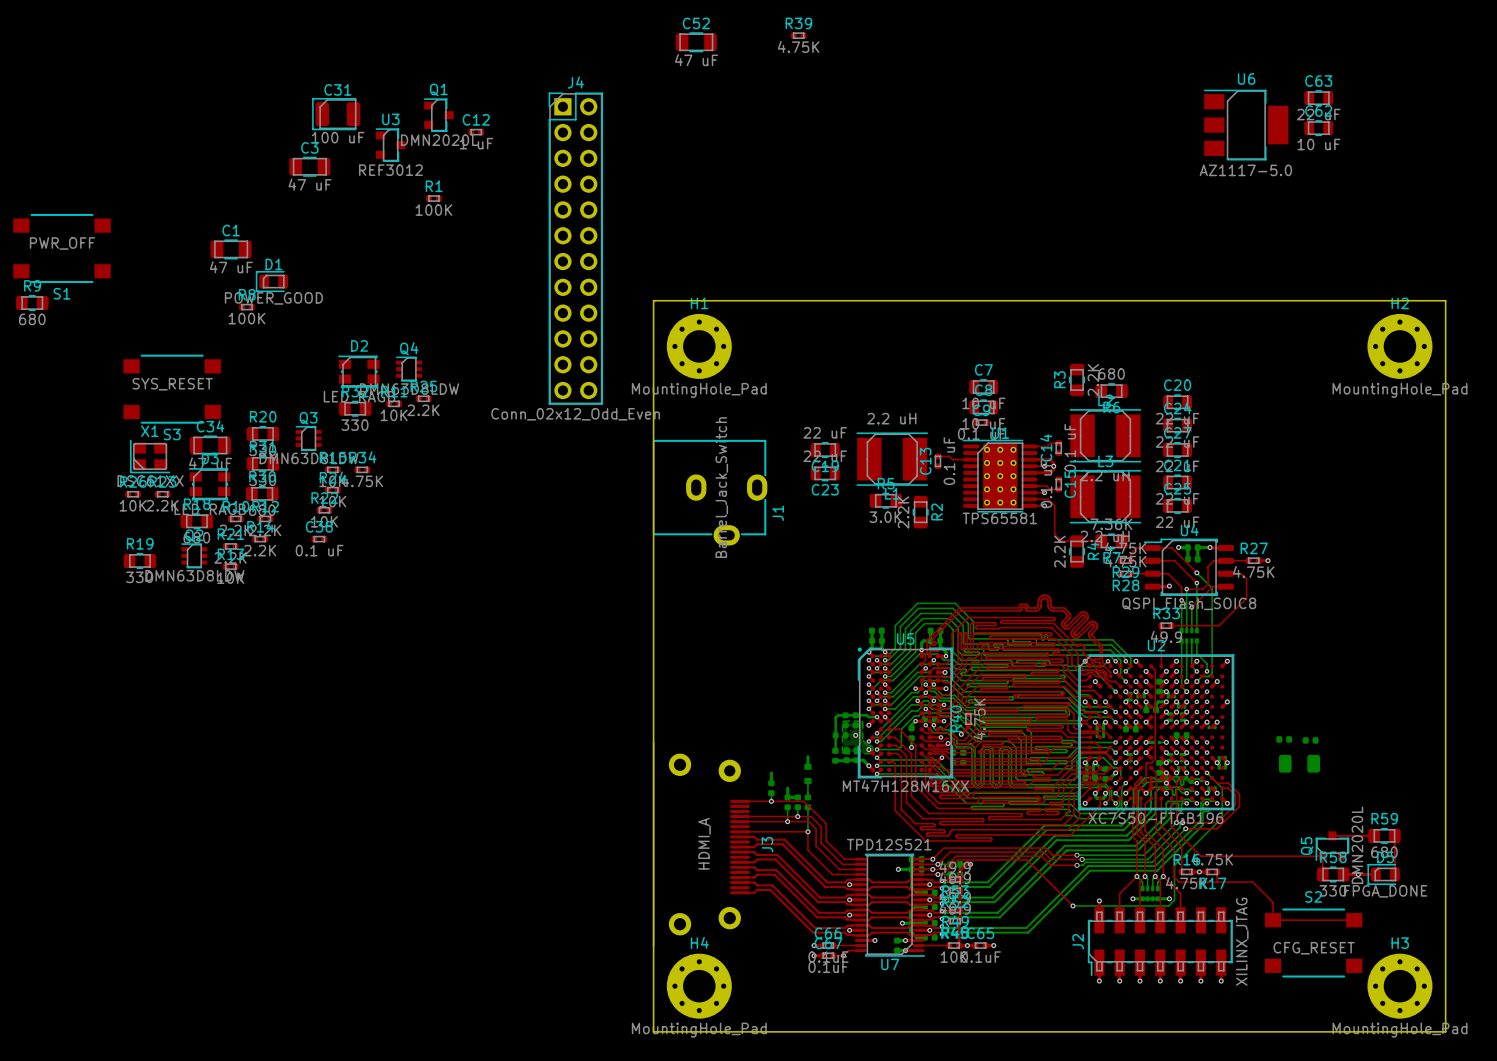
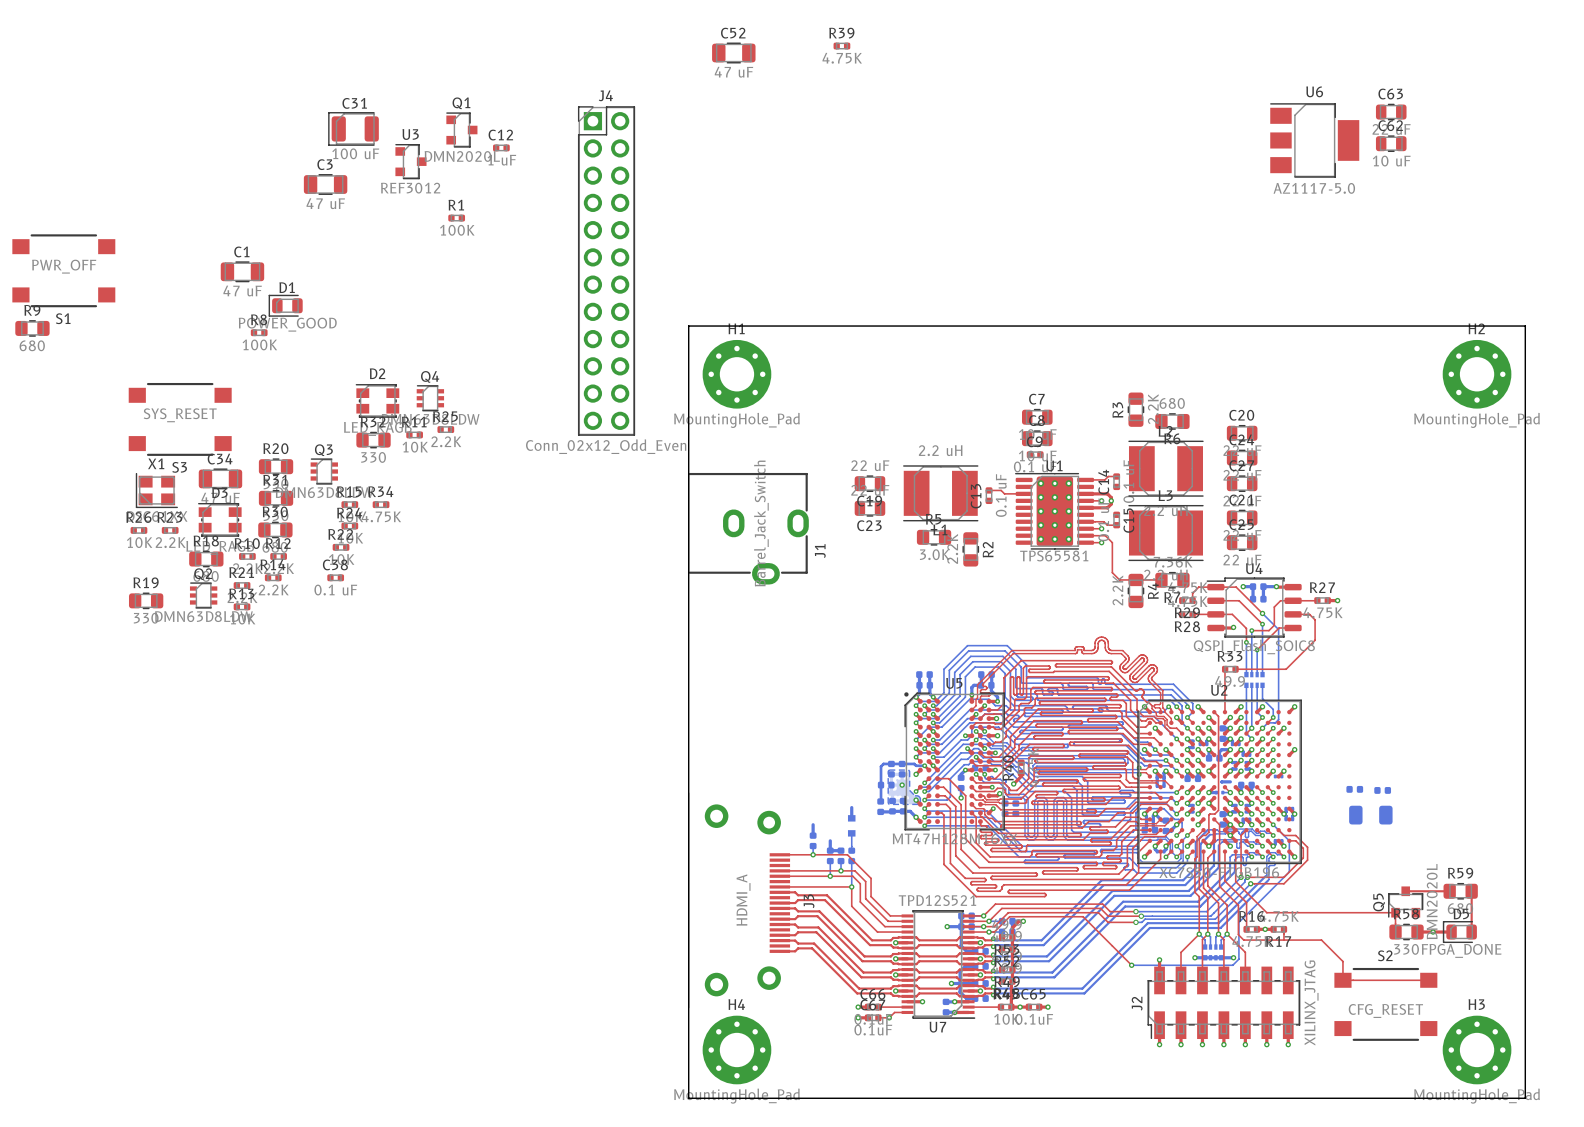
bottom track: none -> (1230, 781) (1221, 782)

